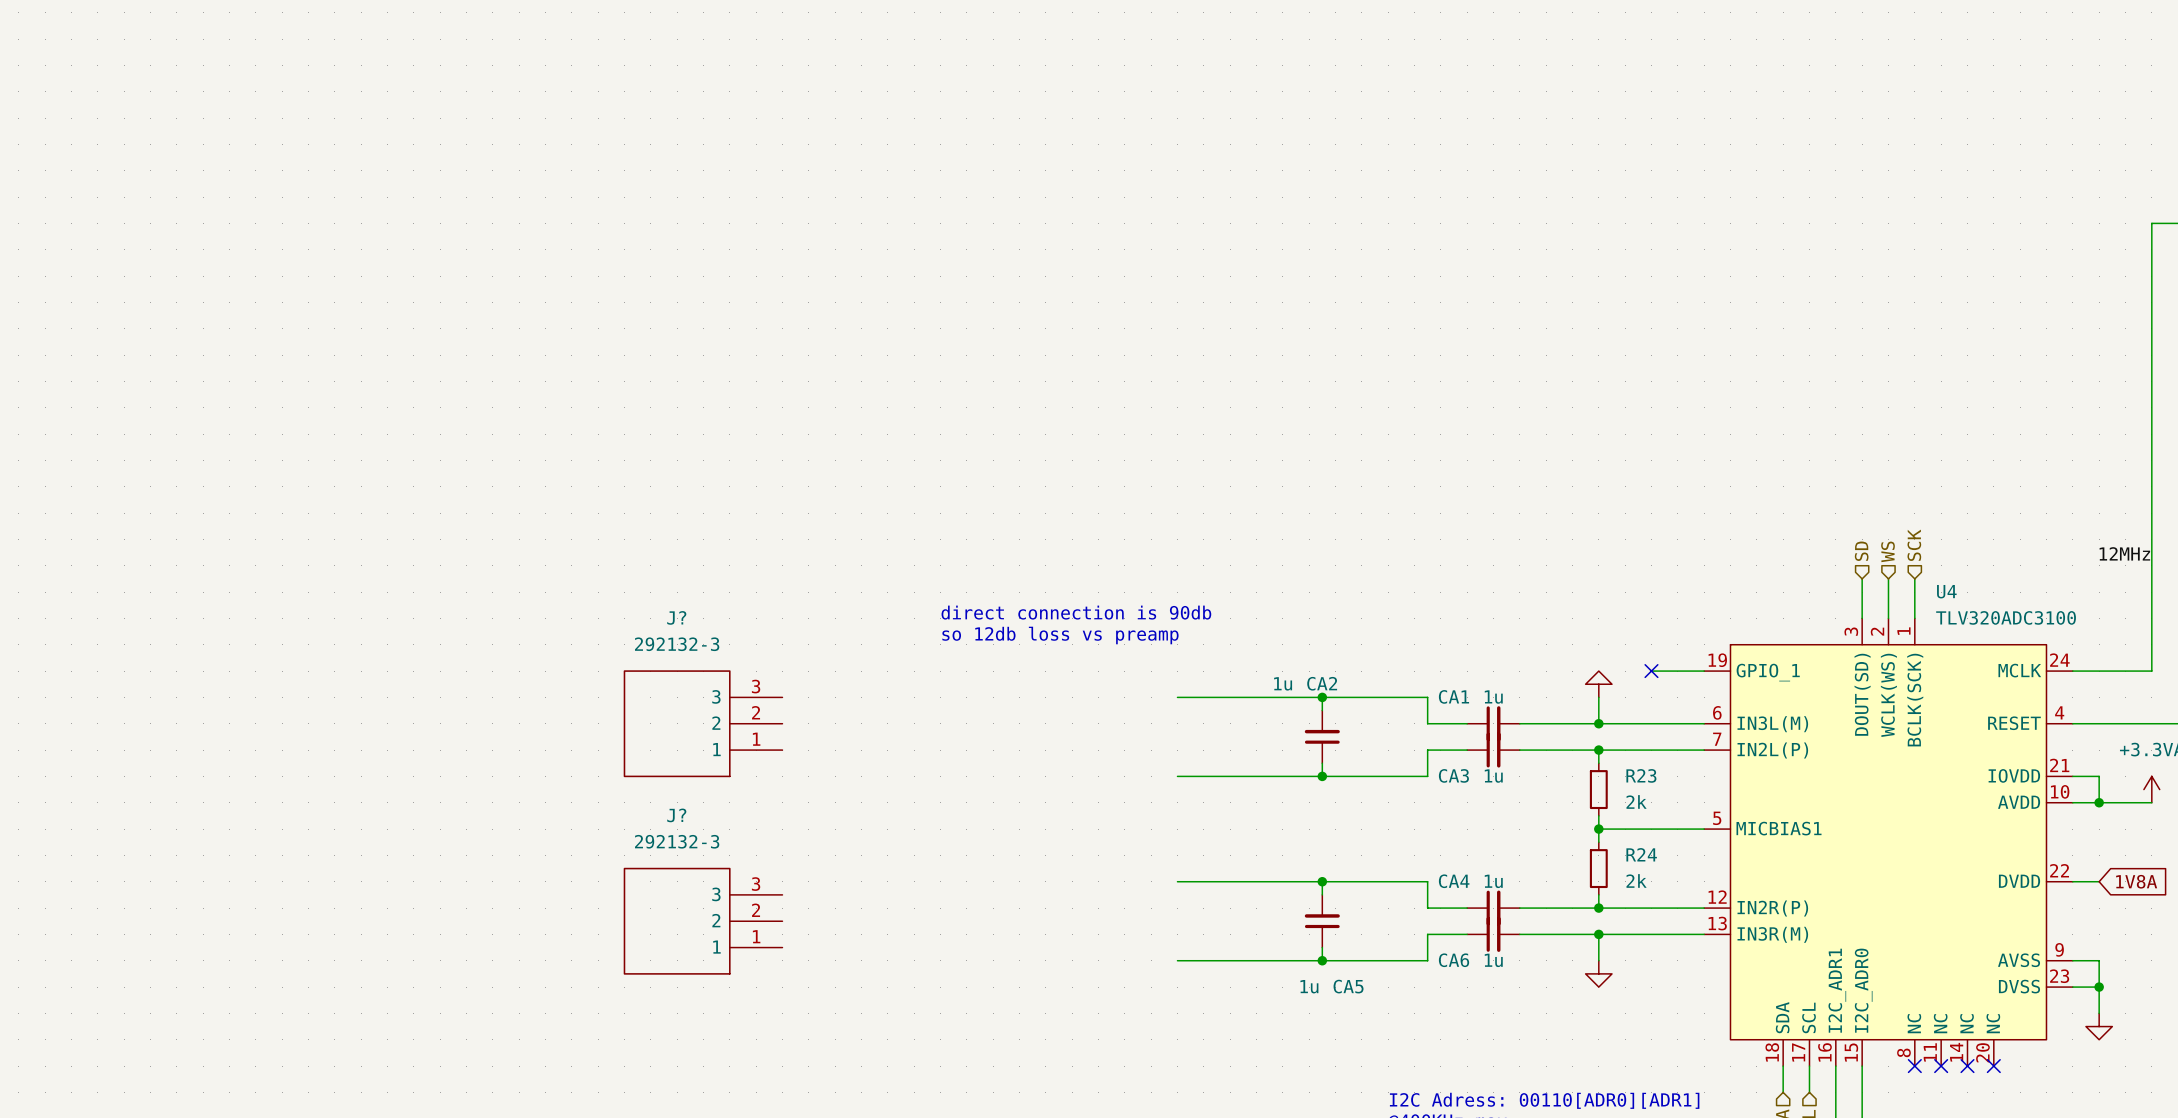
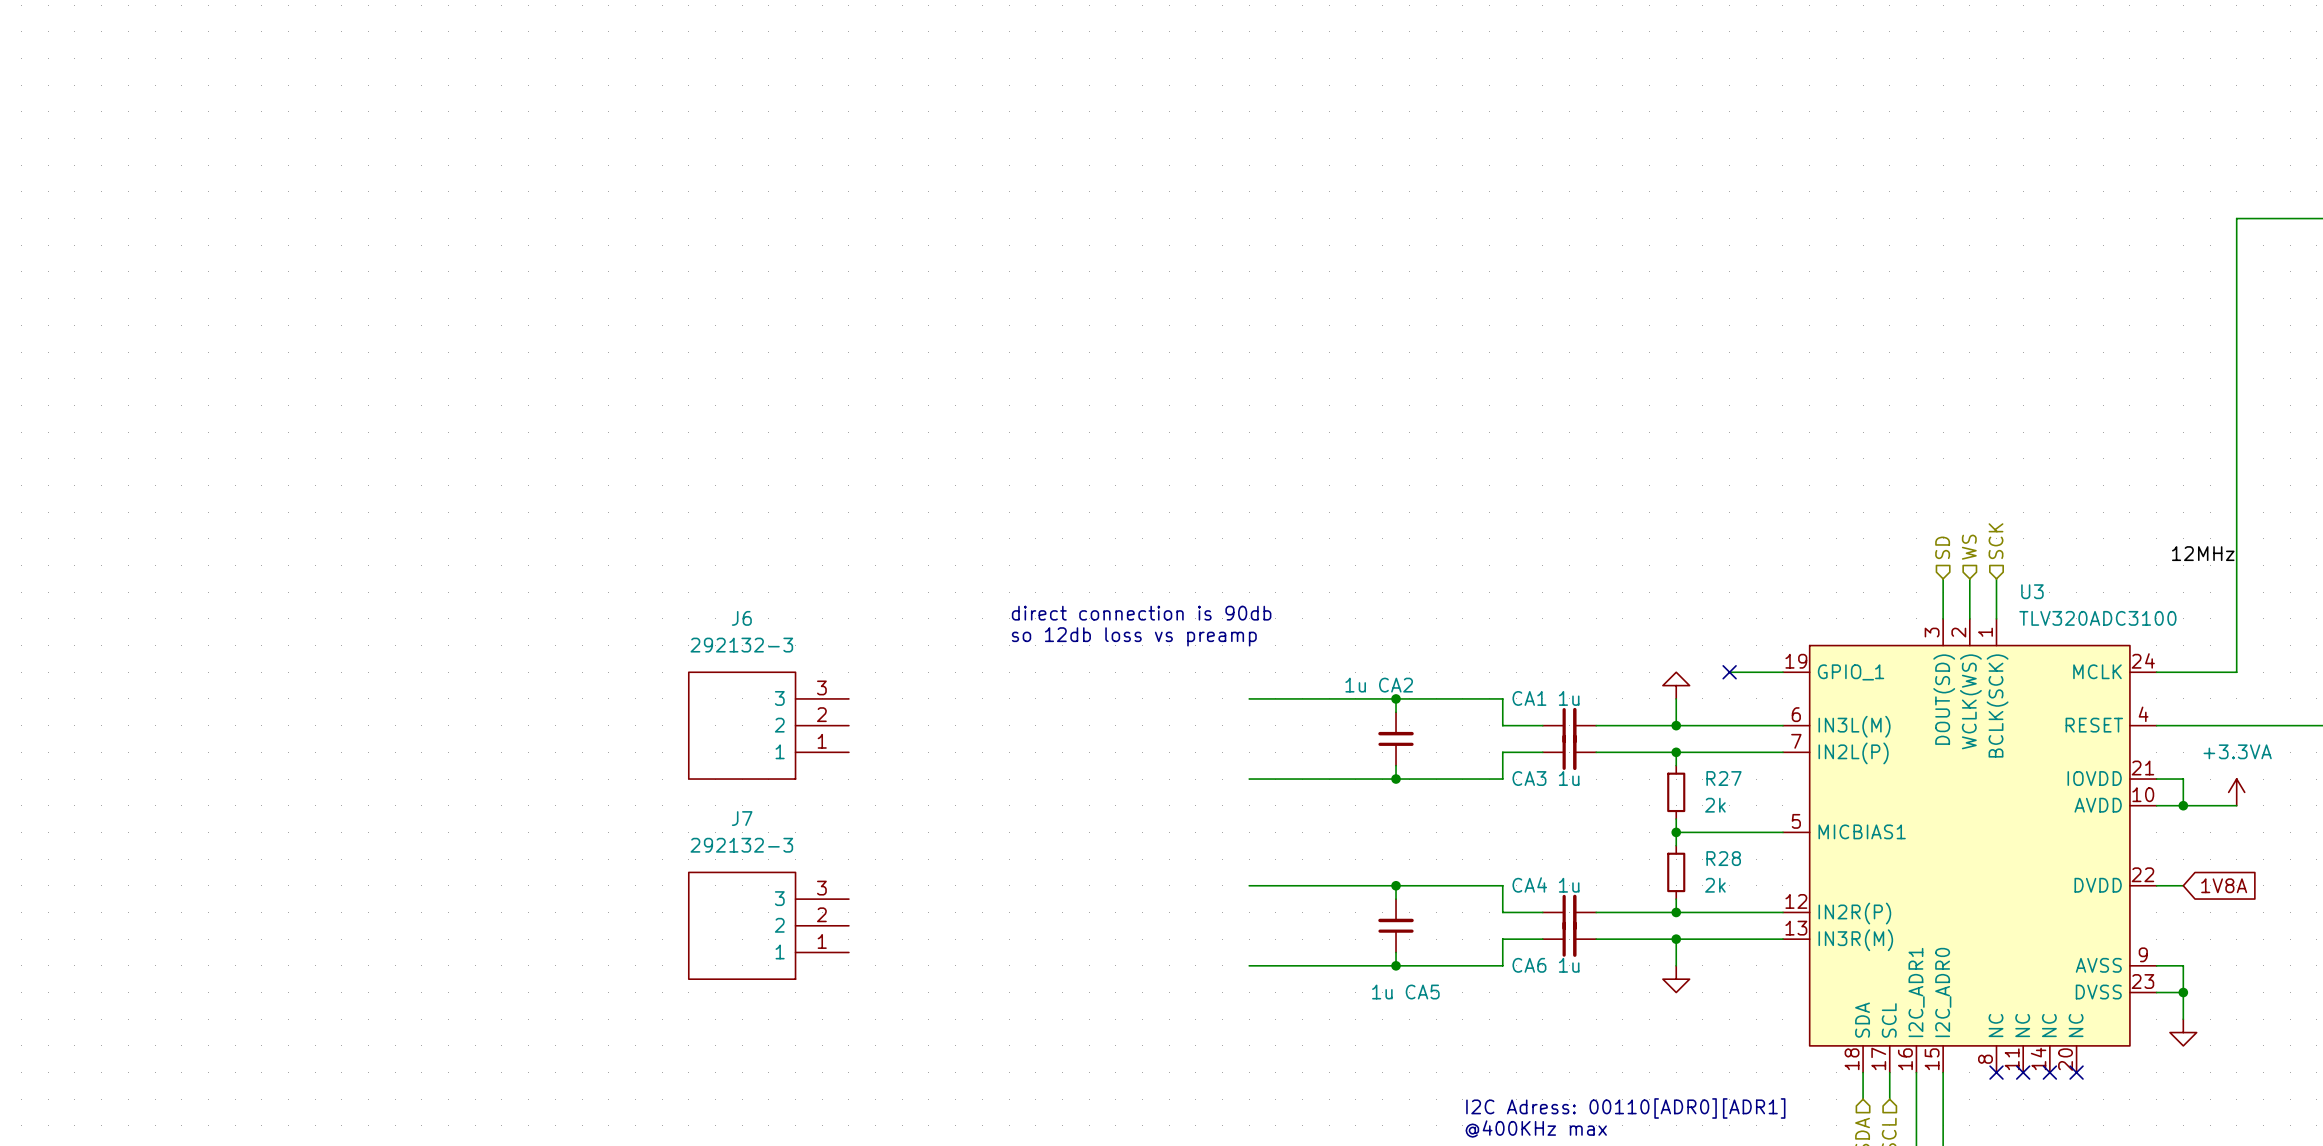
U4 name: U4 (1946, 591) -> U3 (2032, 591)
J? name: J? (676, 617) -> J6 (741, 618)
R23 name: R23 (1641, 775) -> R27 (1724, 778)
J? name: J? (676, 815) -> J7 (742, 818)
R24 name: R24 (1641, 854) -> R28 (1723, 858)

